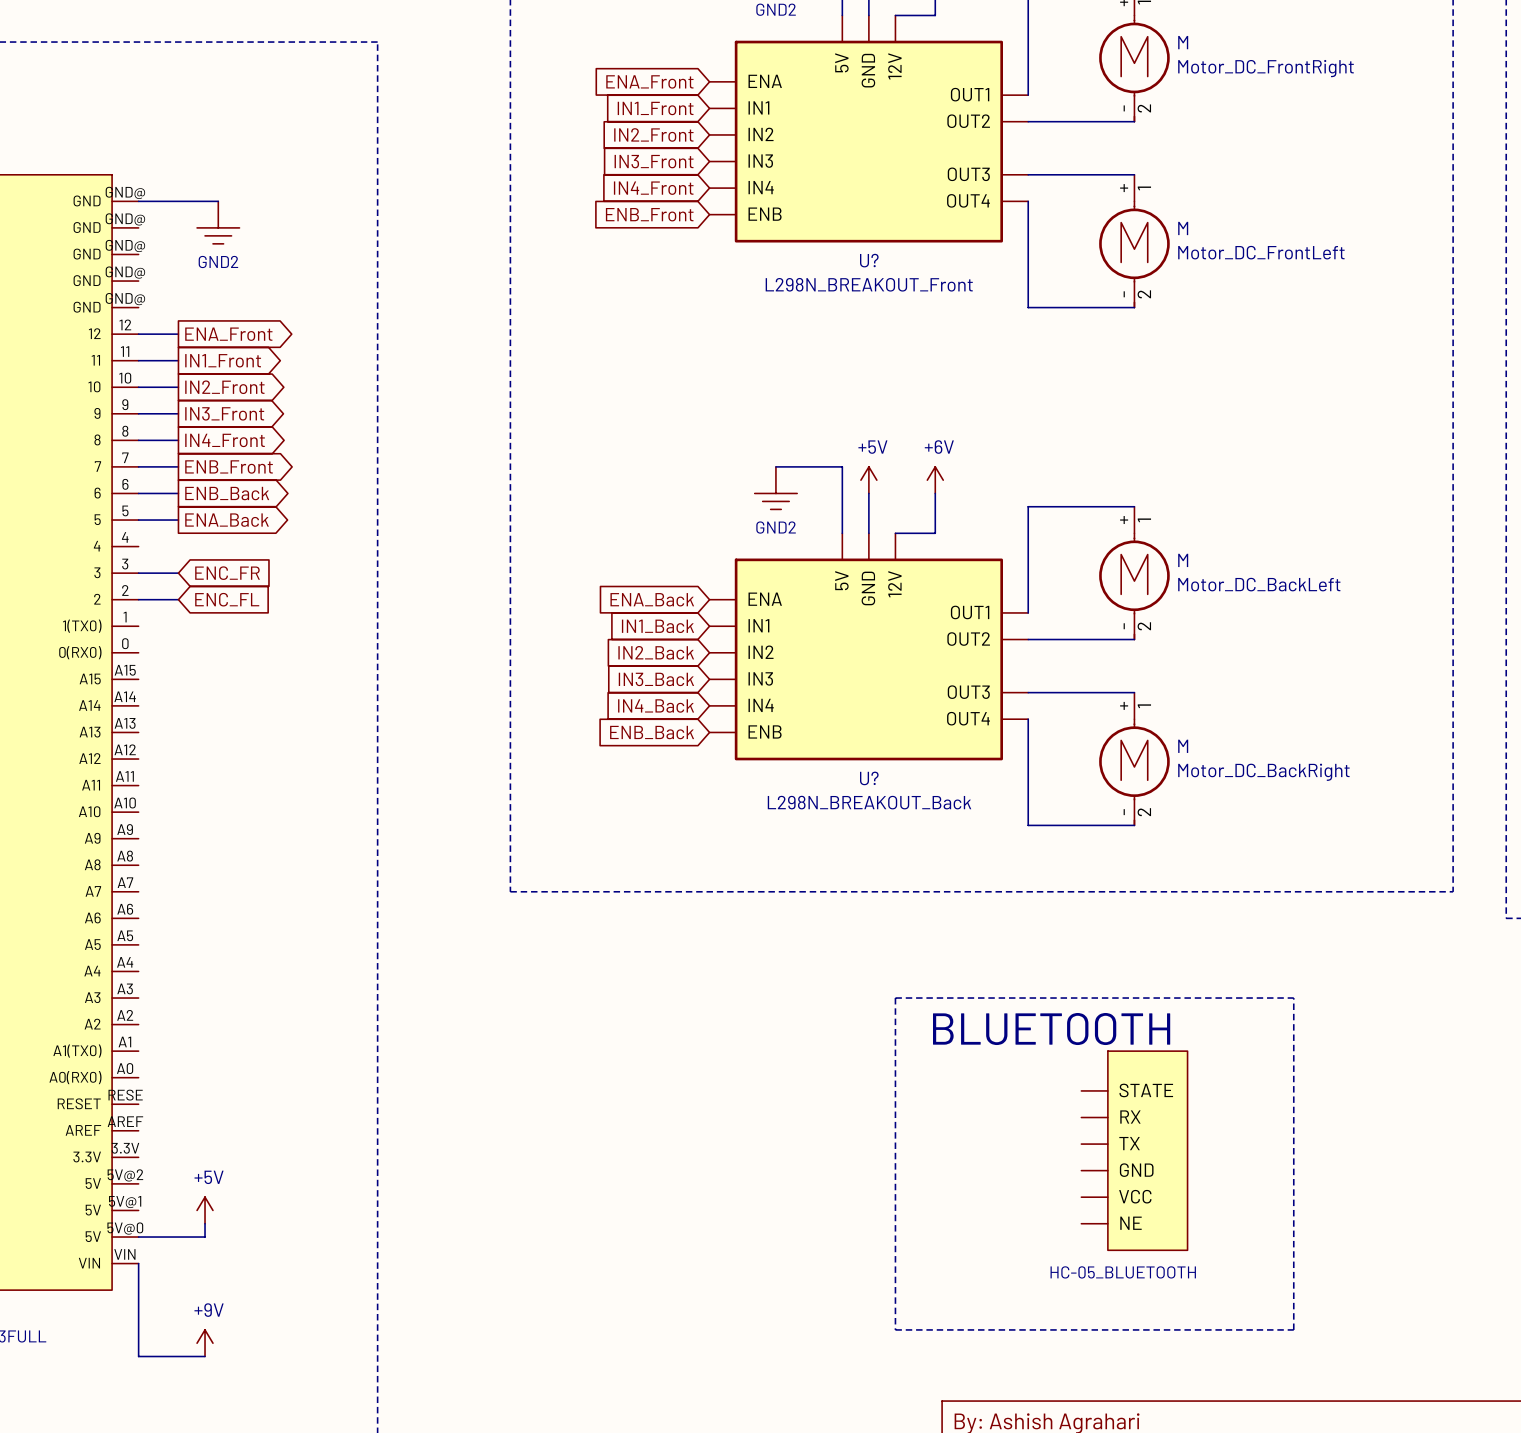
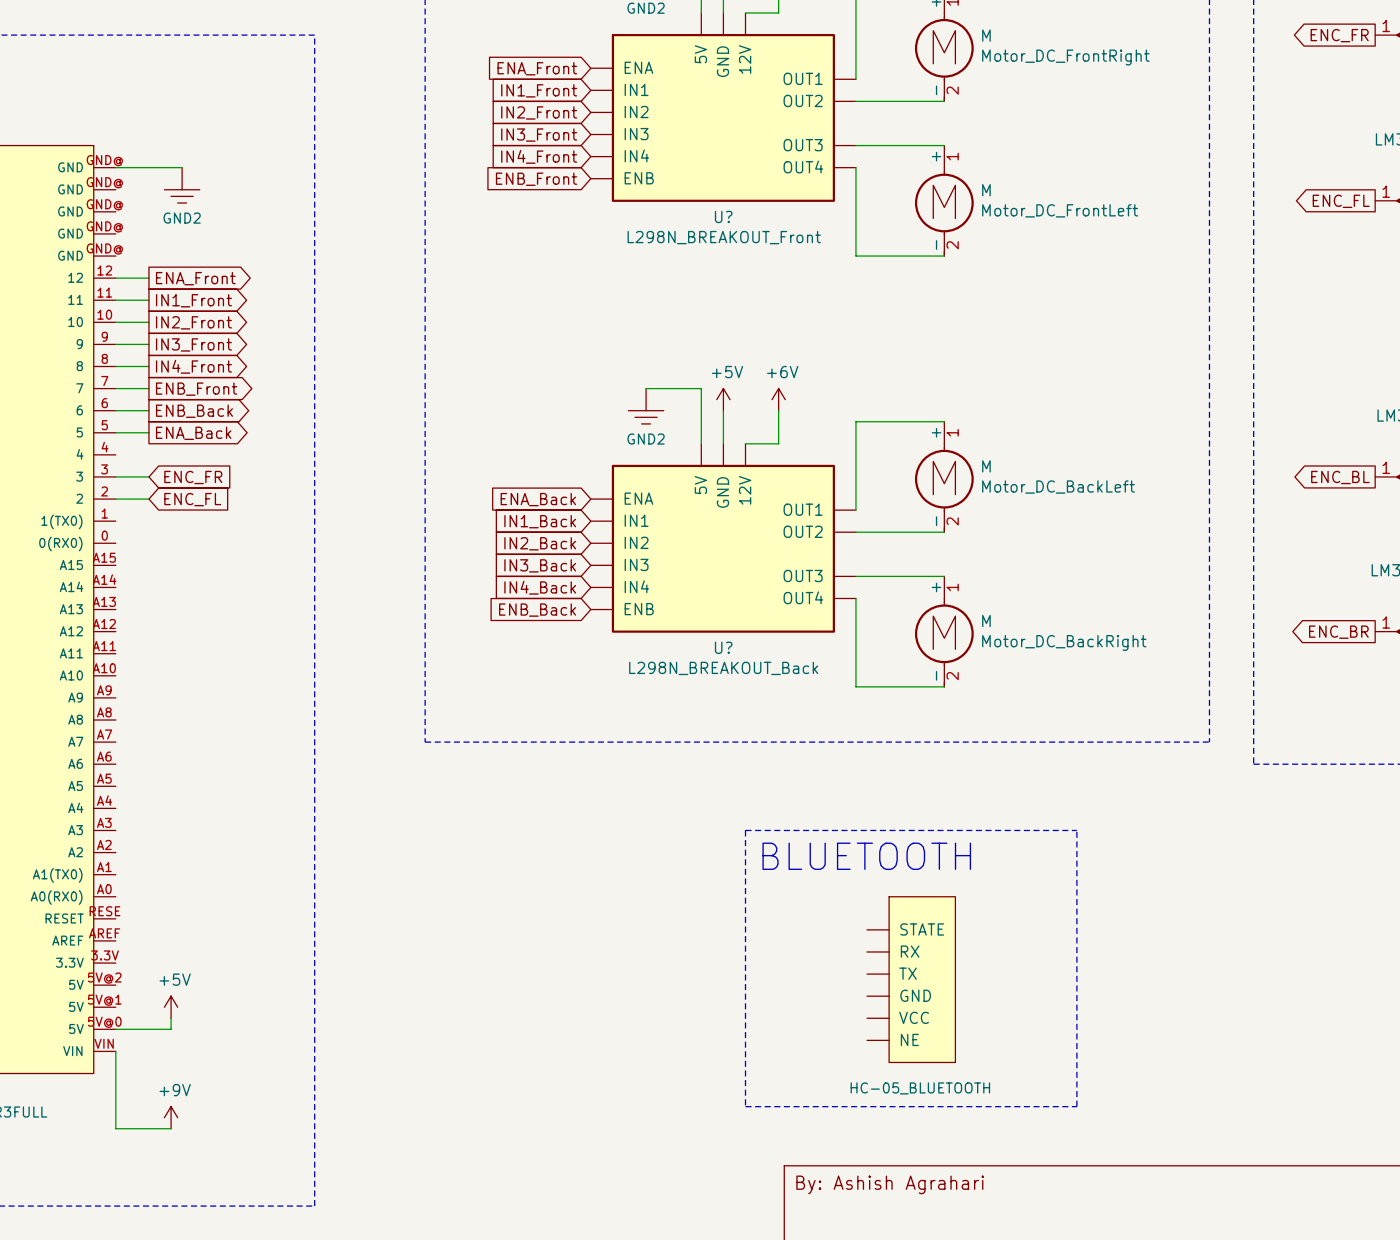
part position: (1167, 1137) -> (938, 968)
part value position: HC-05_BLUETOOTH (1123, 1272) -> HC-05_BLUETOOTH (920, 1088)

